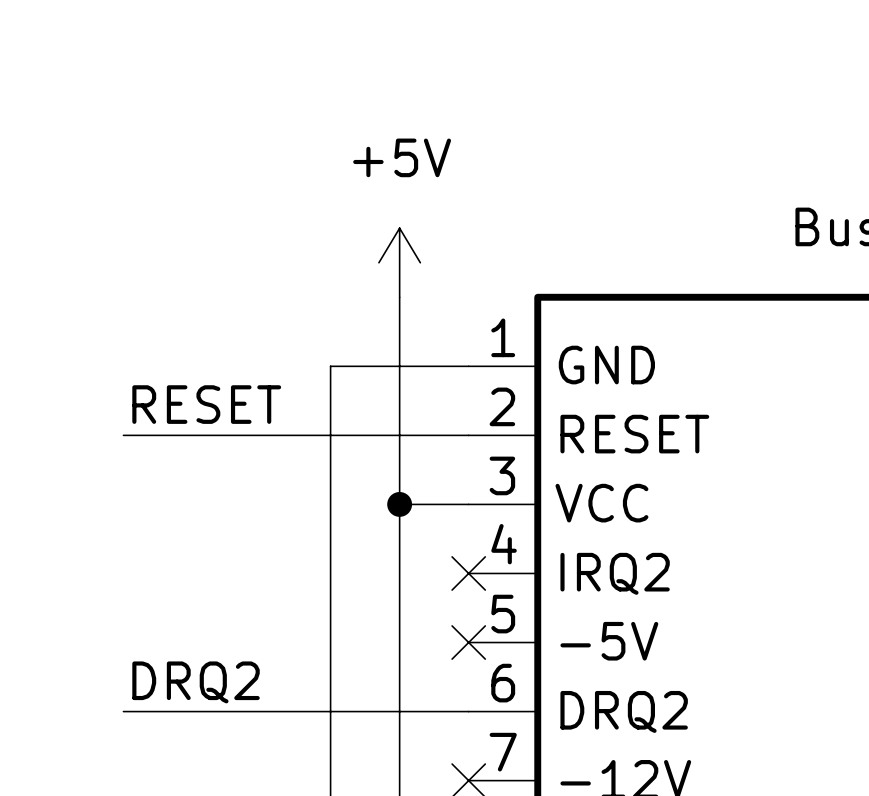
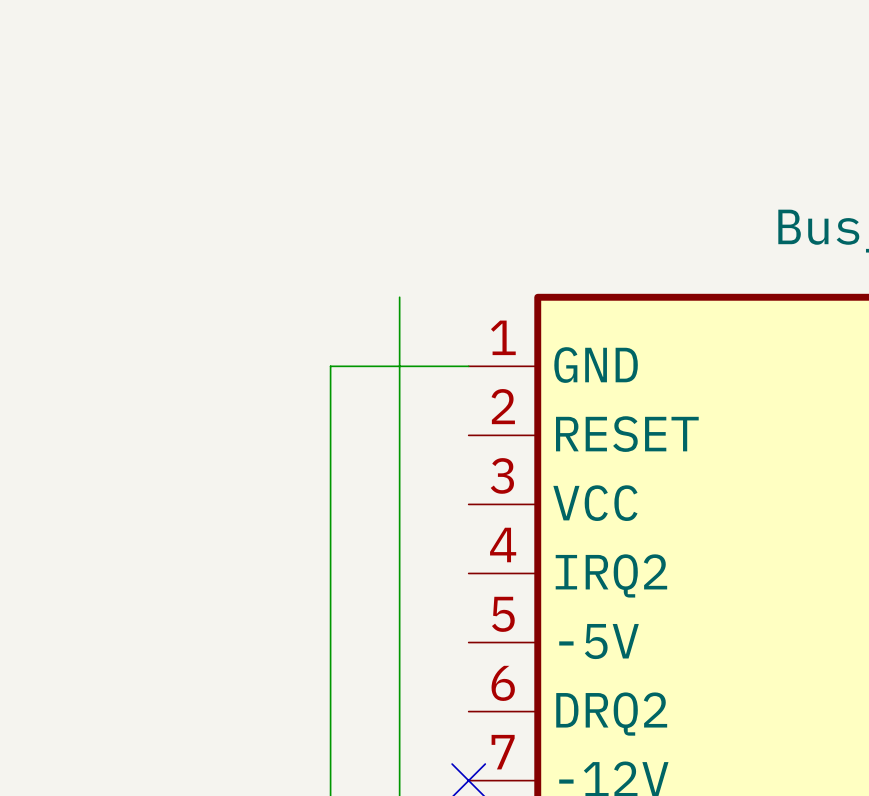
power symbol: +5V (399, 262) -> none
label: RESET (206, 404) -> none
wire: (123, 435) (468, 435) -> none
wire: (399, 504) (468, 504) -> none
junction: (399, 504) -> none
no-connect mark: (468, 573) -> none
no-connect mark: (468, 642) -> none
label: DRQ2 (196, 682) -> none
wire: (123, 711) (468, 711) -> none

